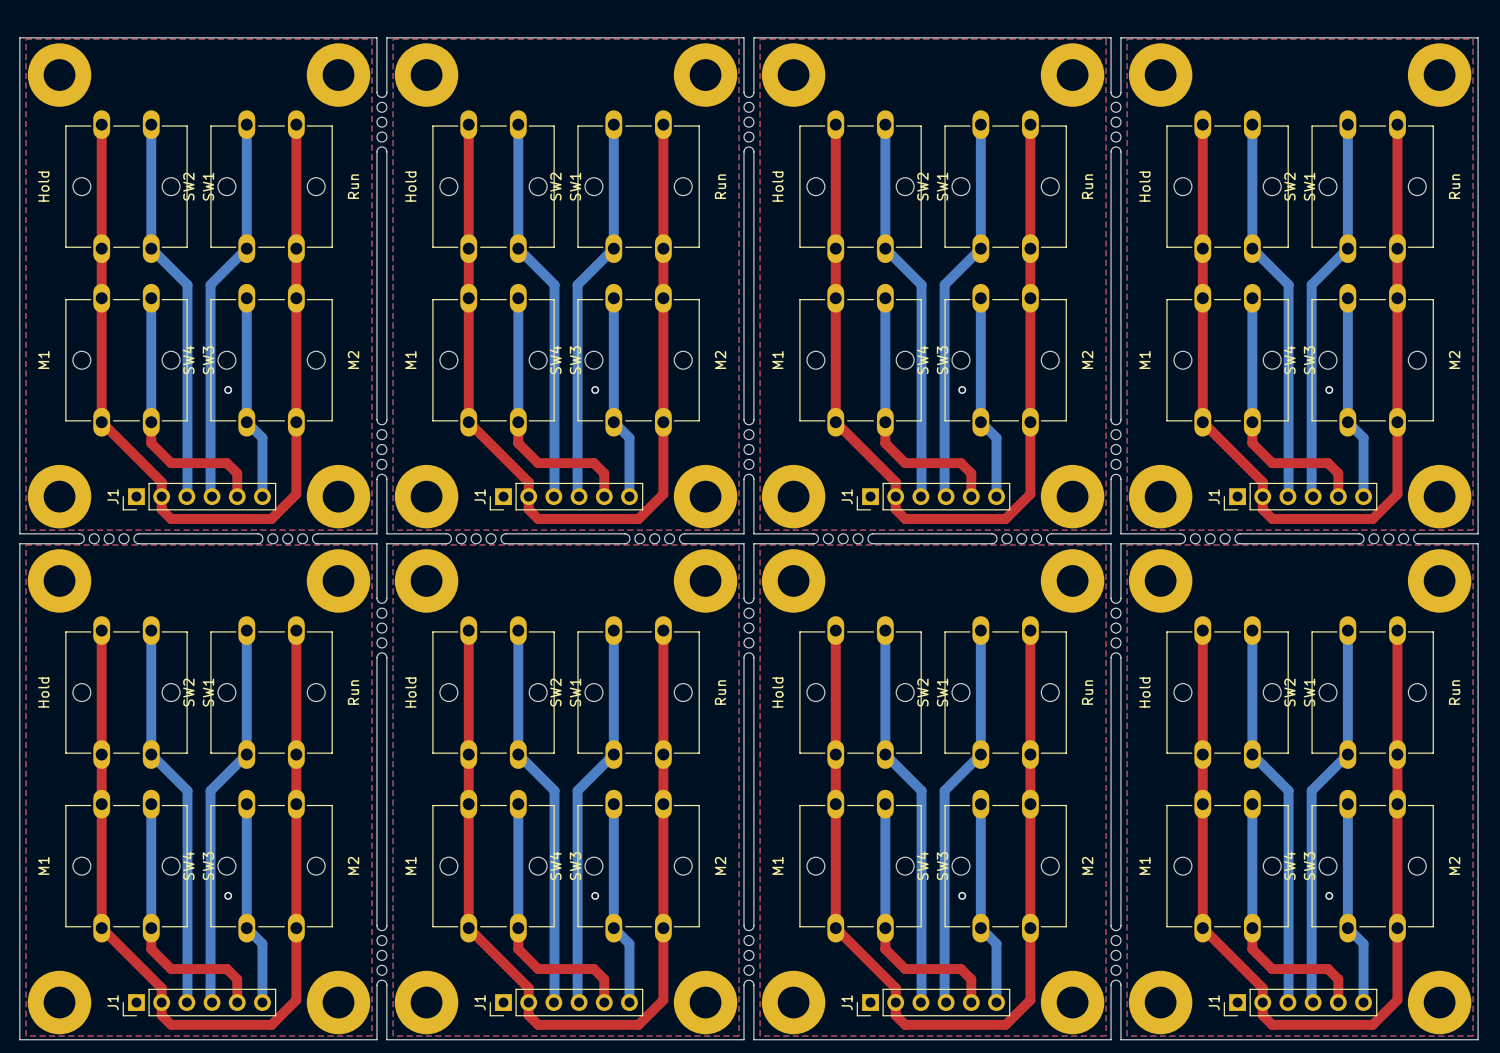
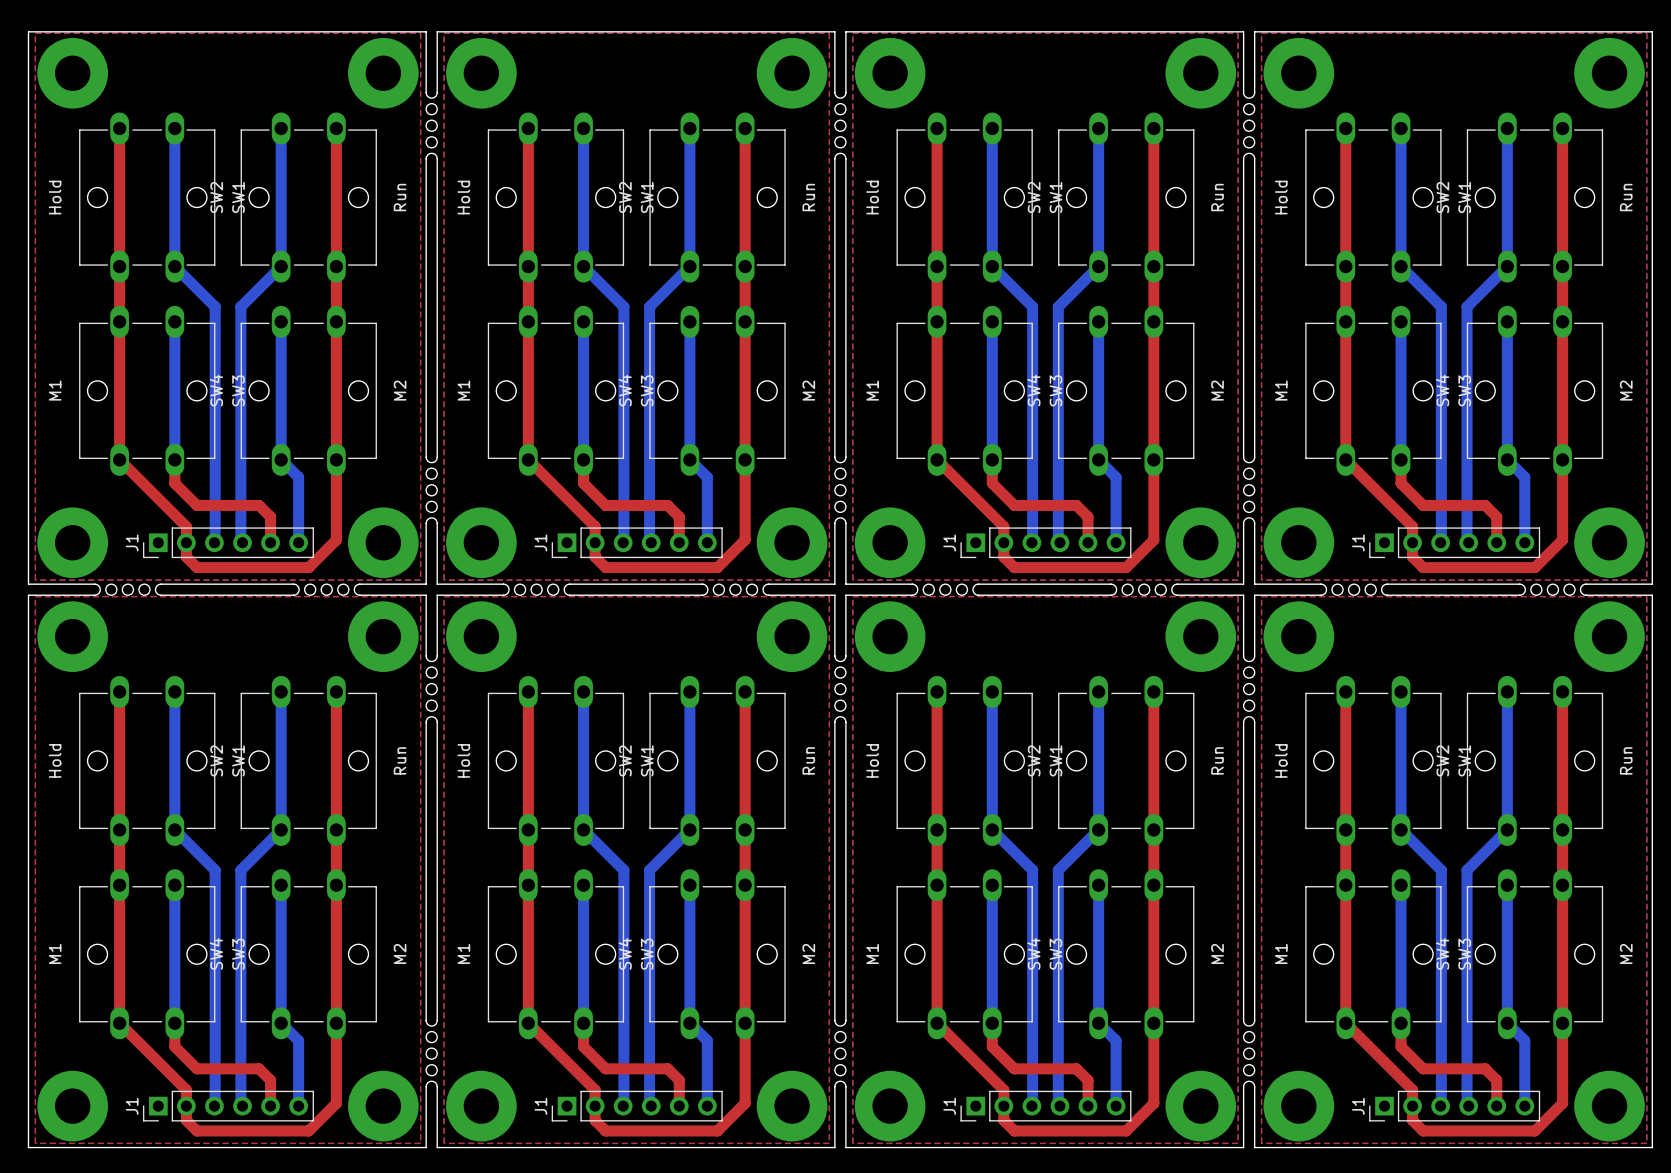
via: (228, 389) -> none
via: (595, 389) -> none
via: (962, 389) -> none
via: (1329, 389) -> none
via: (228, 895) -> none
via: (595, 895) -> none
via: (962, 895) -> none
via: (1329, 895) -> none

